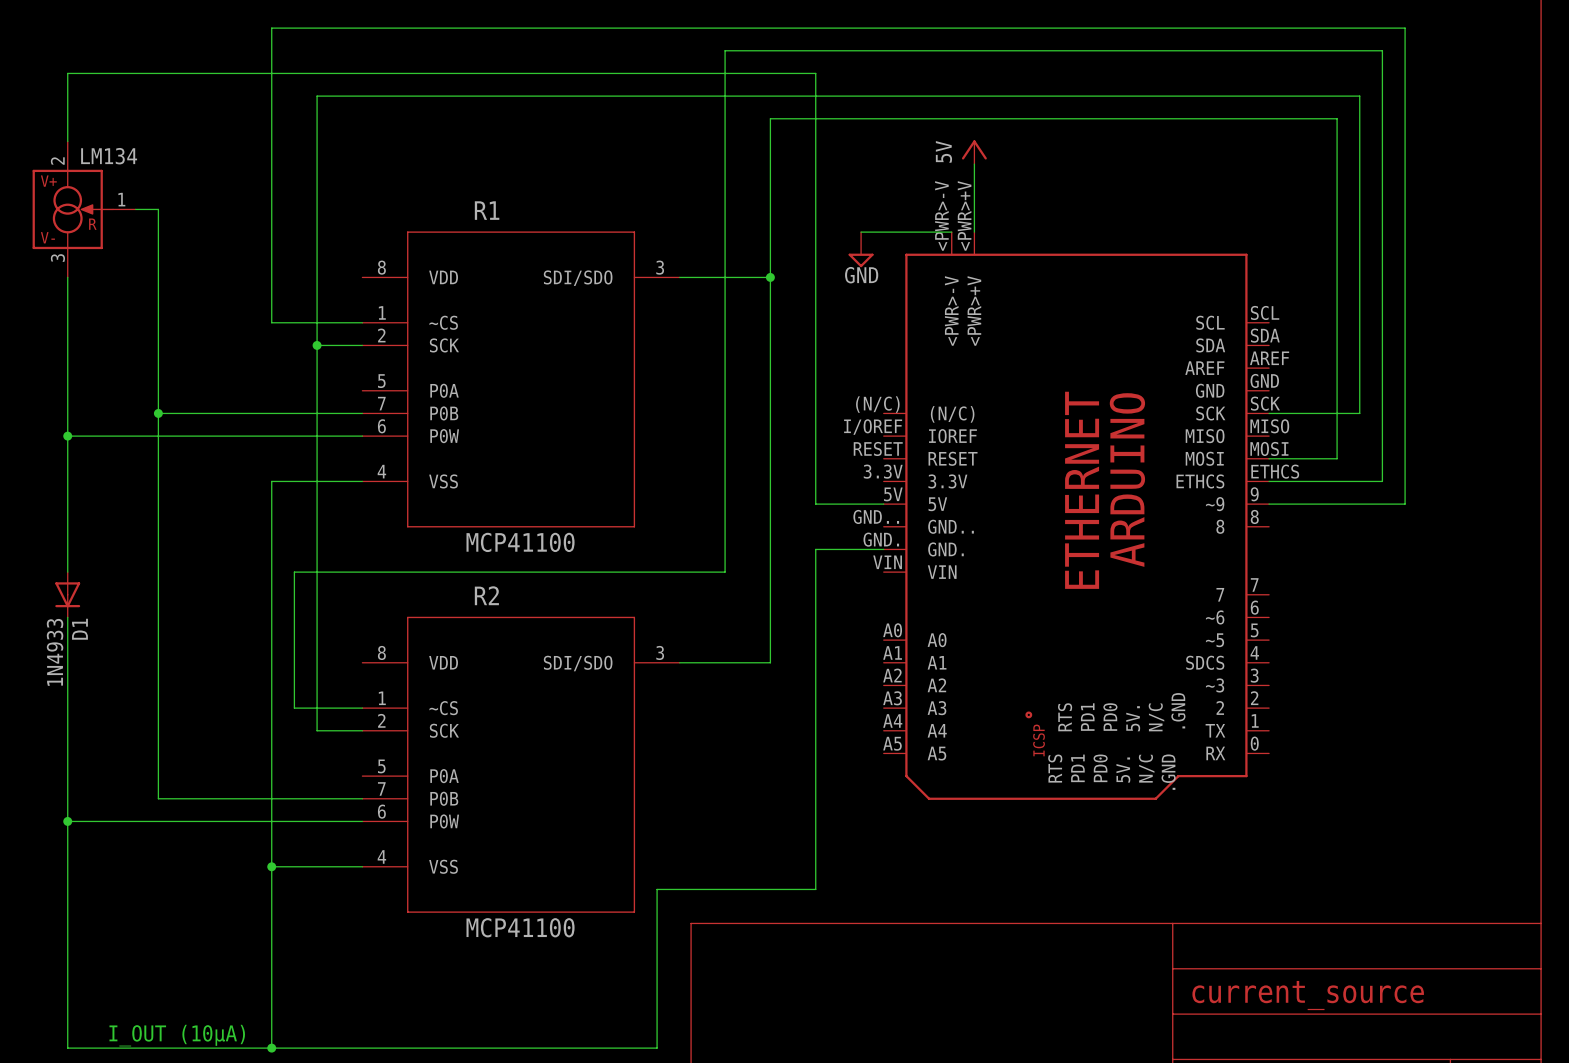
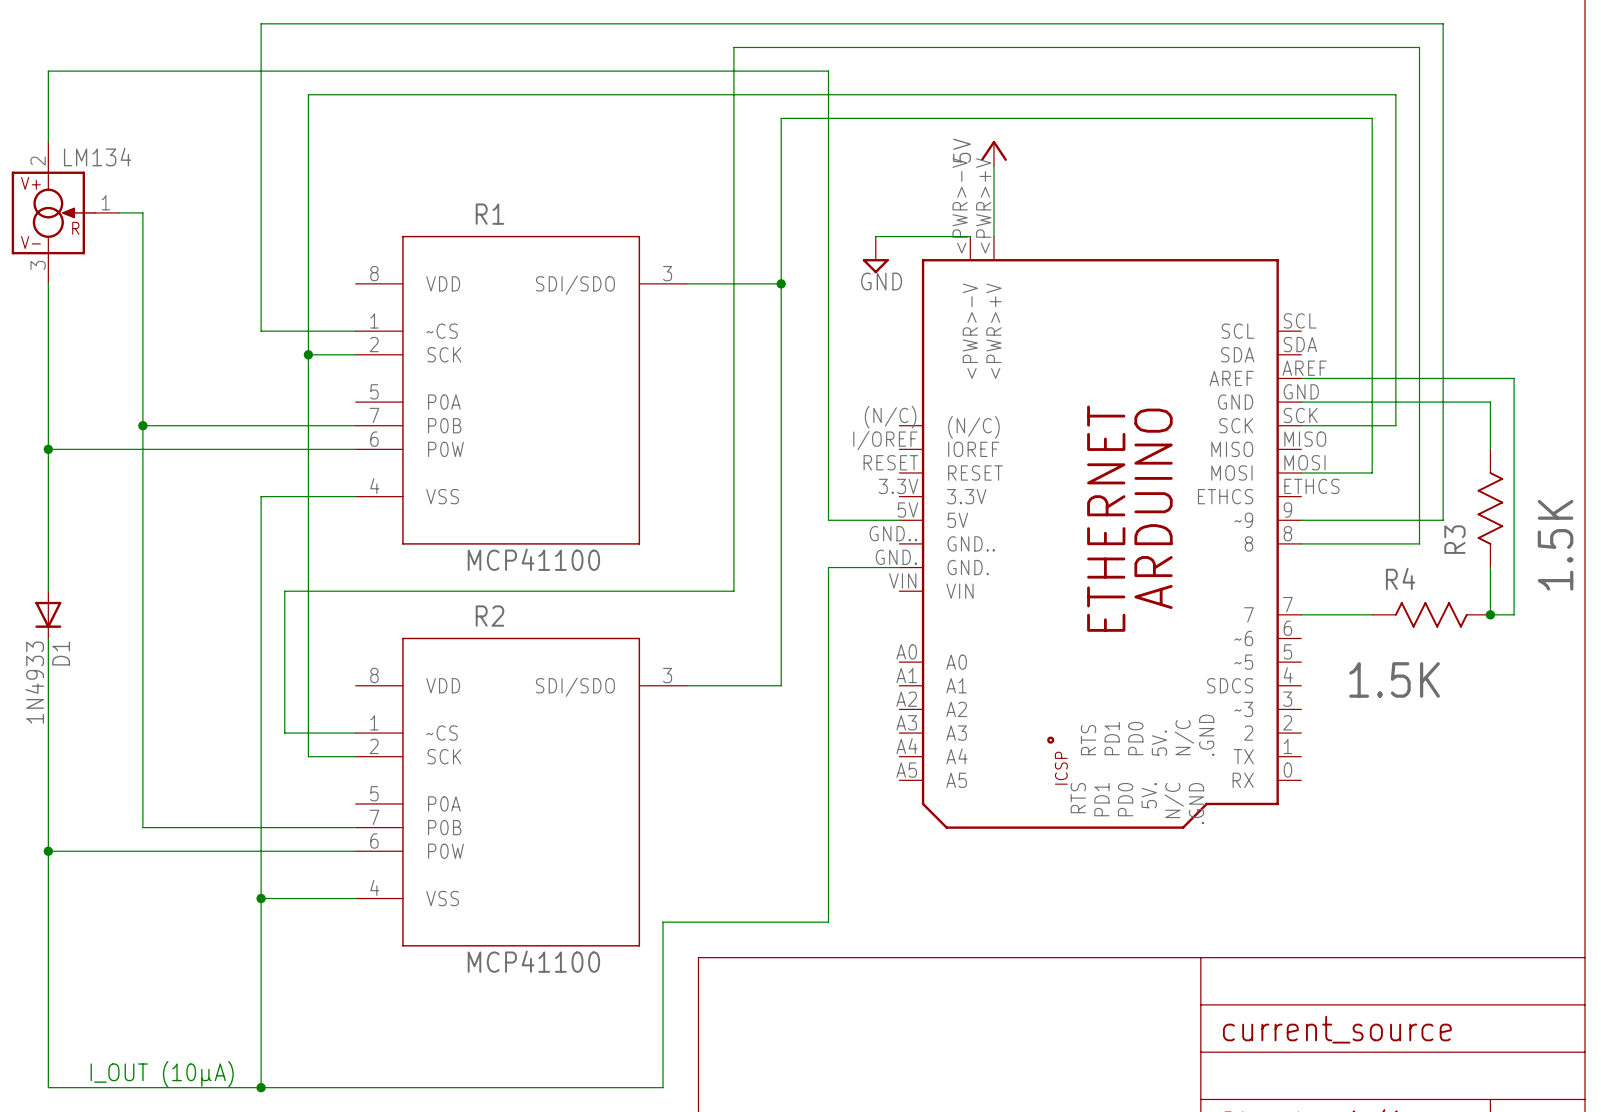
wire: none -> (1301, 378) (1514, 378) (1514, 614) (1490, 614) (1490, 567)
wire: none -> (1301, 402) (1490, 402) (1490, 449)
wire: (1269, 481) (1382, 481) -> (1301, 543) (1419, 543) (1419, 496)
R3: none -> 1.5K (1490, 508)
wire: none -> (1301, 614) (1372, 614)
R4: none -> 1.5K (1431, 614)
junction: none -> (1490, 614)

